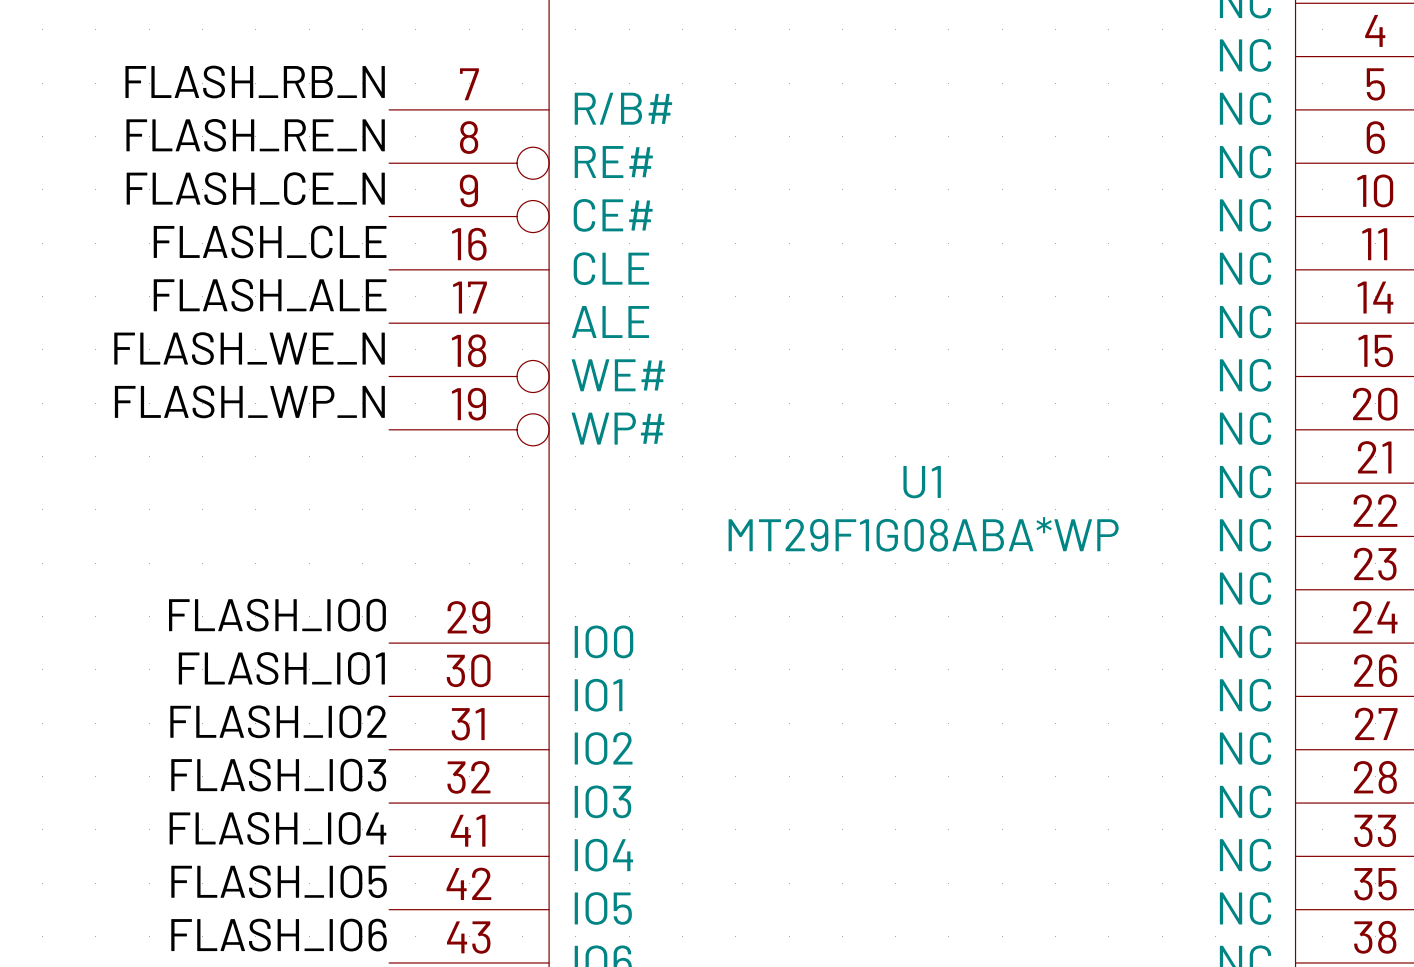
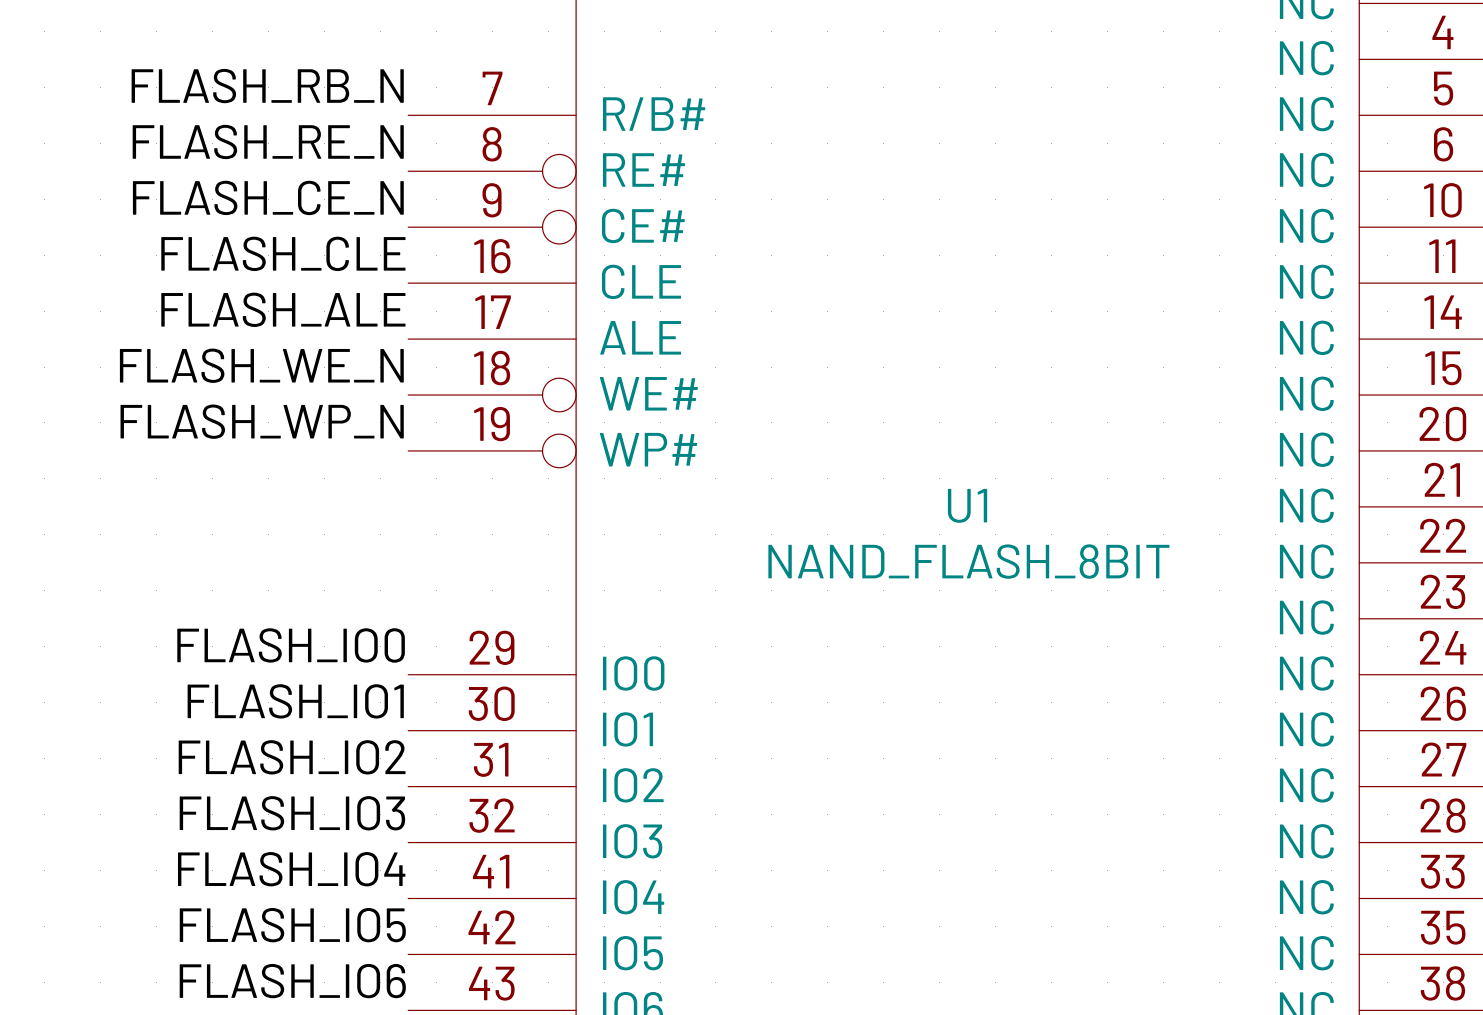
U1 value: MT29F1G08ABA*WP (923, 534) -> NAND_FLASH_8BIT (968, 561)

